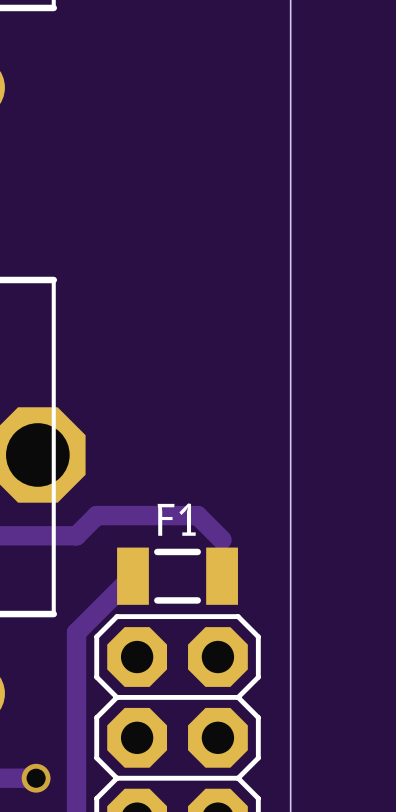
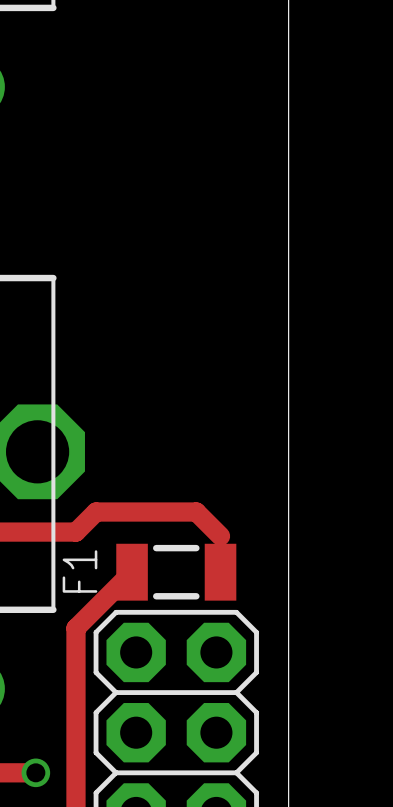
F1 name rotation: 0° (176, 519) -> 90° counterclockwise (79, 571)
F1 name position: F1 (176, 519) -> F1 (79, 571)

